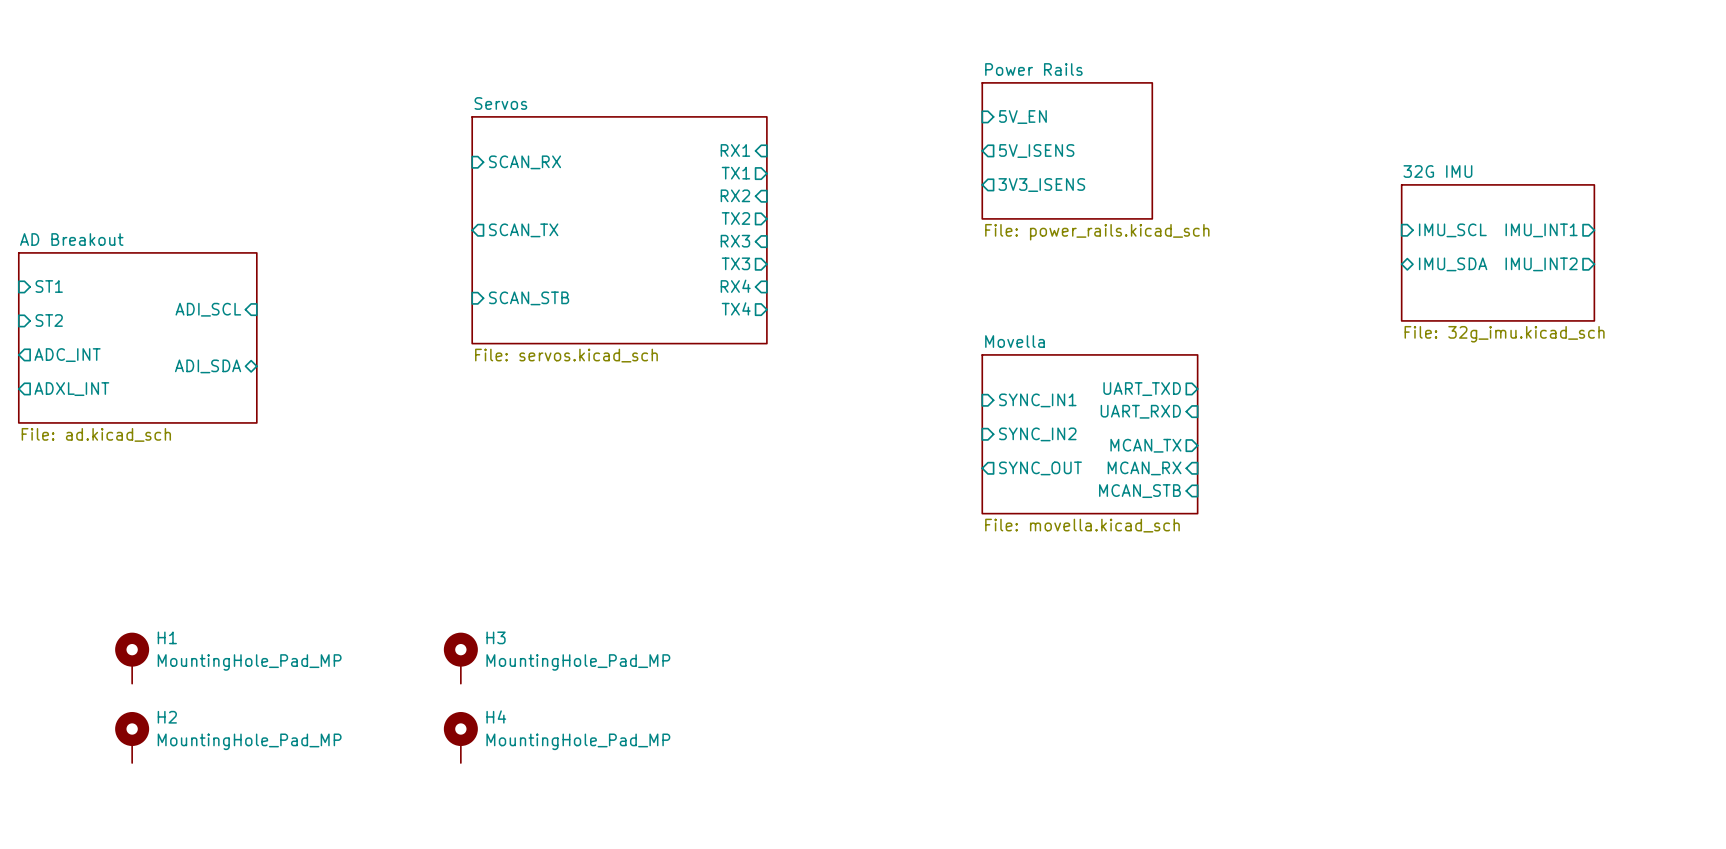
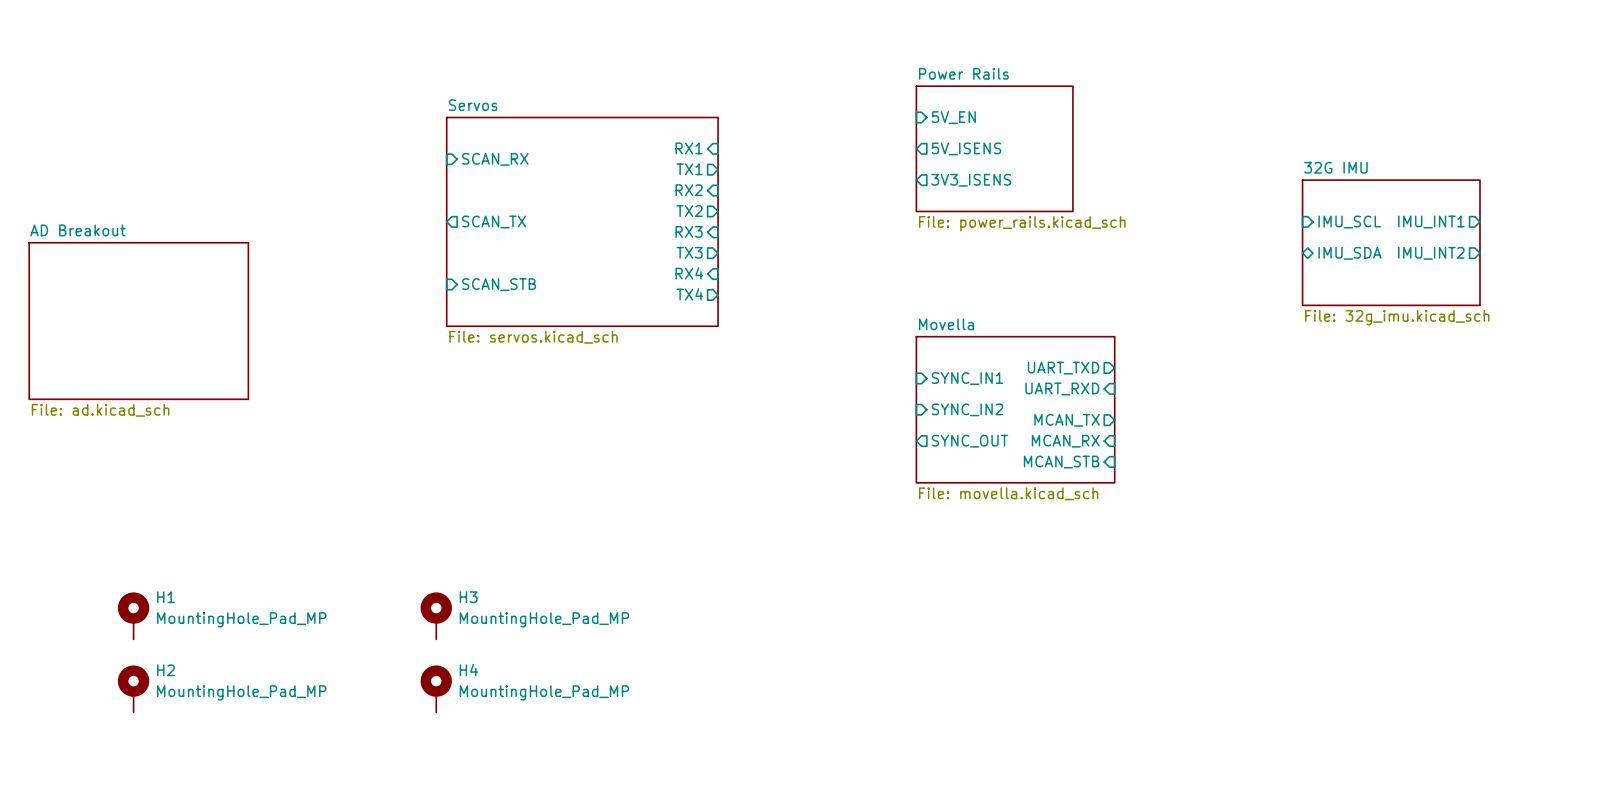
sheet pin: ST1 (49, 286) -> none
sheet pin: ADI_SCL (208, 309) -> none
sheet pin: ST2 (49, 320) -> none
sheet pin: ADC_INT (67, 355) -> none
sheet pin: ADI_SDA (208, 366) -> none
sheet pin: ADXL_INT (71, 389) -> none

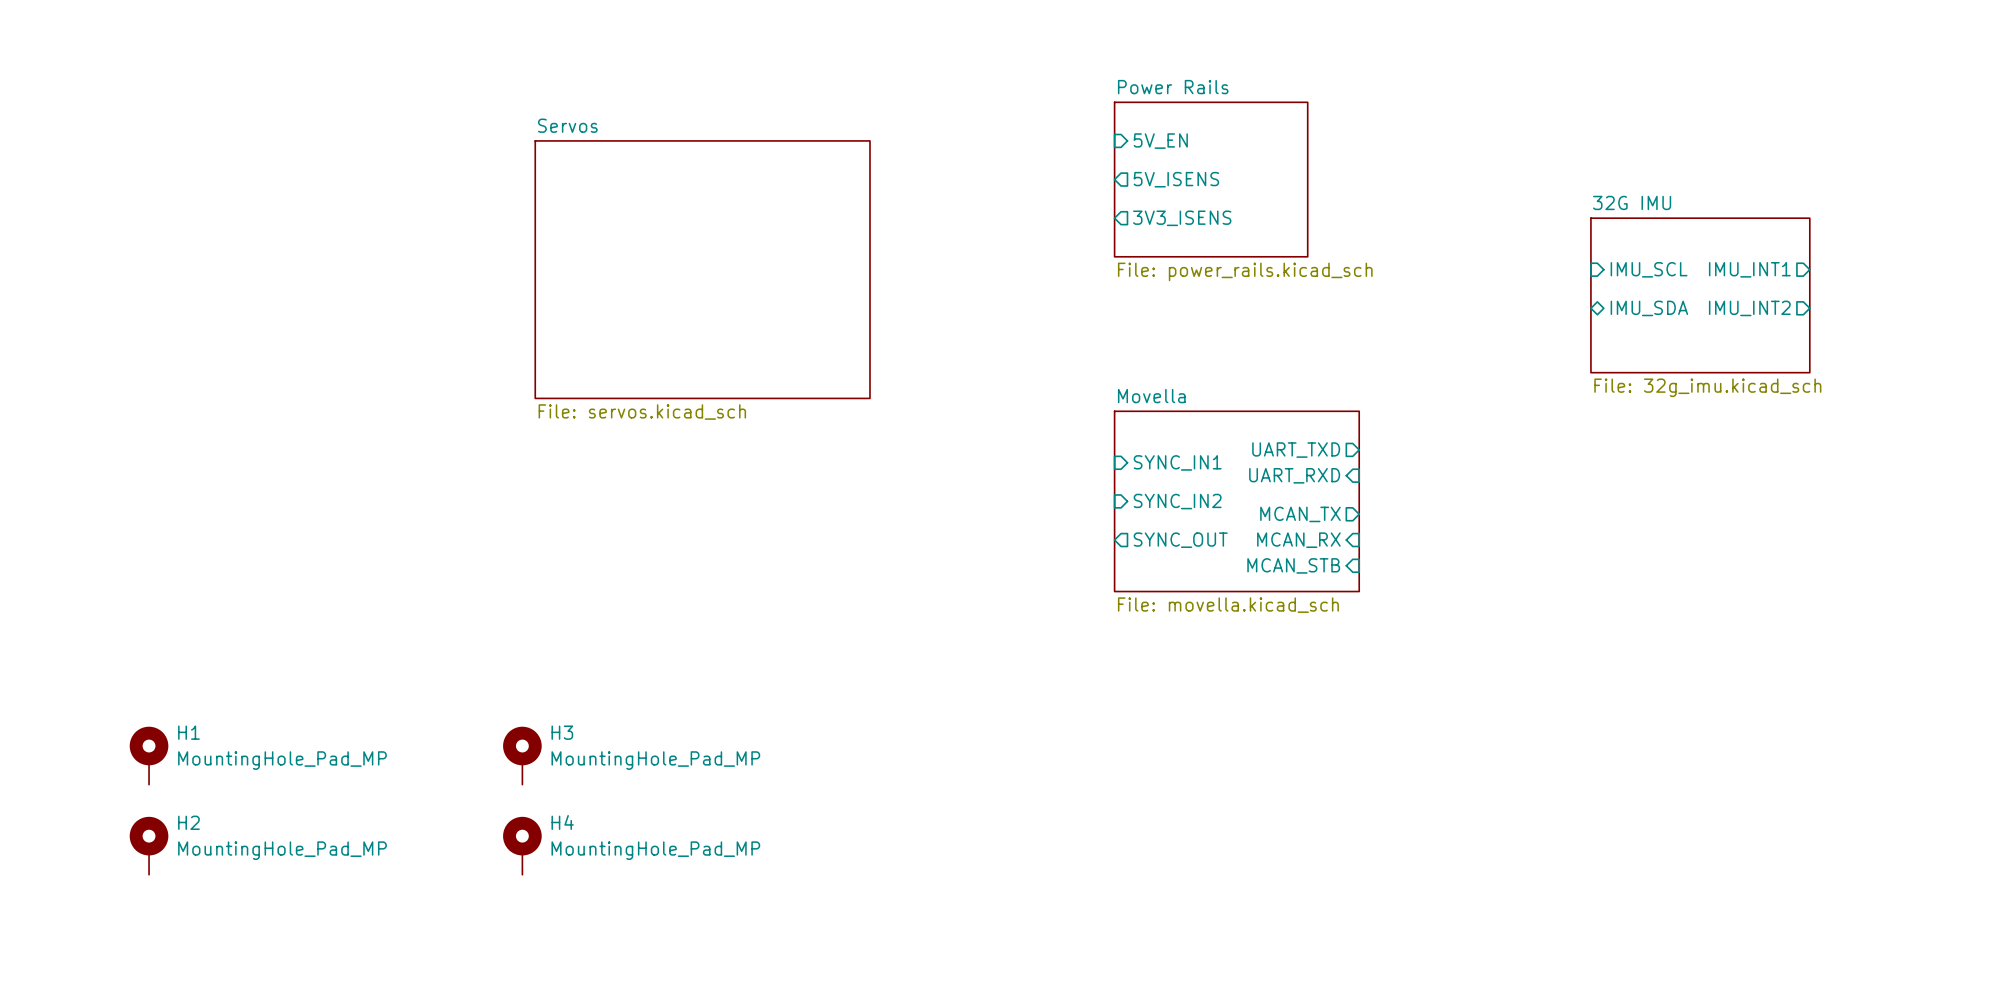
sheet pin: RX1 (689, 148) -> none
sheet pin: SCAN_RX (495, 159) -> none
sheet pin: TX1 (689, 169) -> none
sheet pin: RX2 (689, 190) -> none
sheet pin: TX2 (689, 211) -> none
sheet pin: SCAN_TX (494, 221) -> none
sheet pin: RX3 (689, 231) -> none
sheet pin: TX3 (689, 252) -> none
sheet pin: RX4 (689, 273) -> none
sheet pin: SCAN_STB (499, 284) -> none
sheet pin: TX4 (689, 294) -> none
sheet AD Breakout: File: ad.kicad_sch (138, 321) -> none

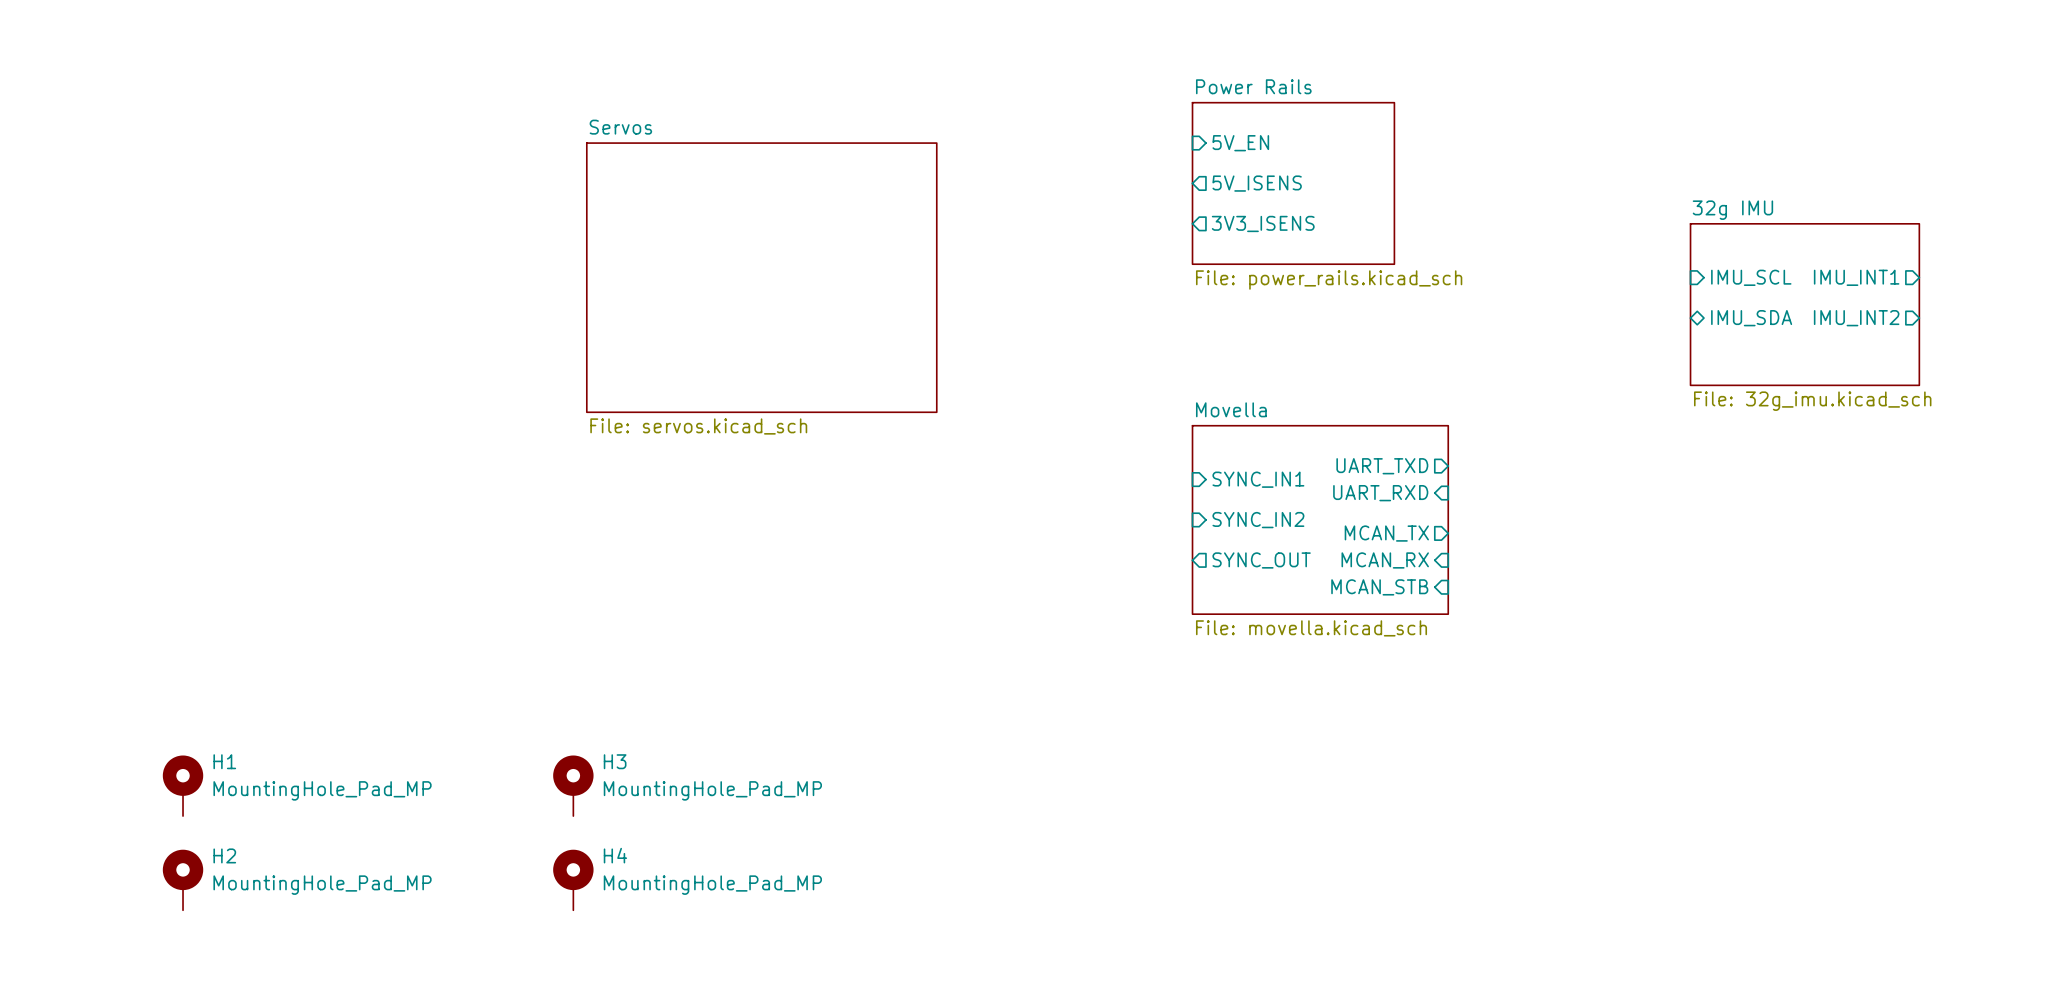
sheet 32G IMU name: 32G IMU (1632, 202) -> 32g IMU (1732, 210)

